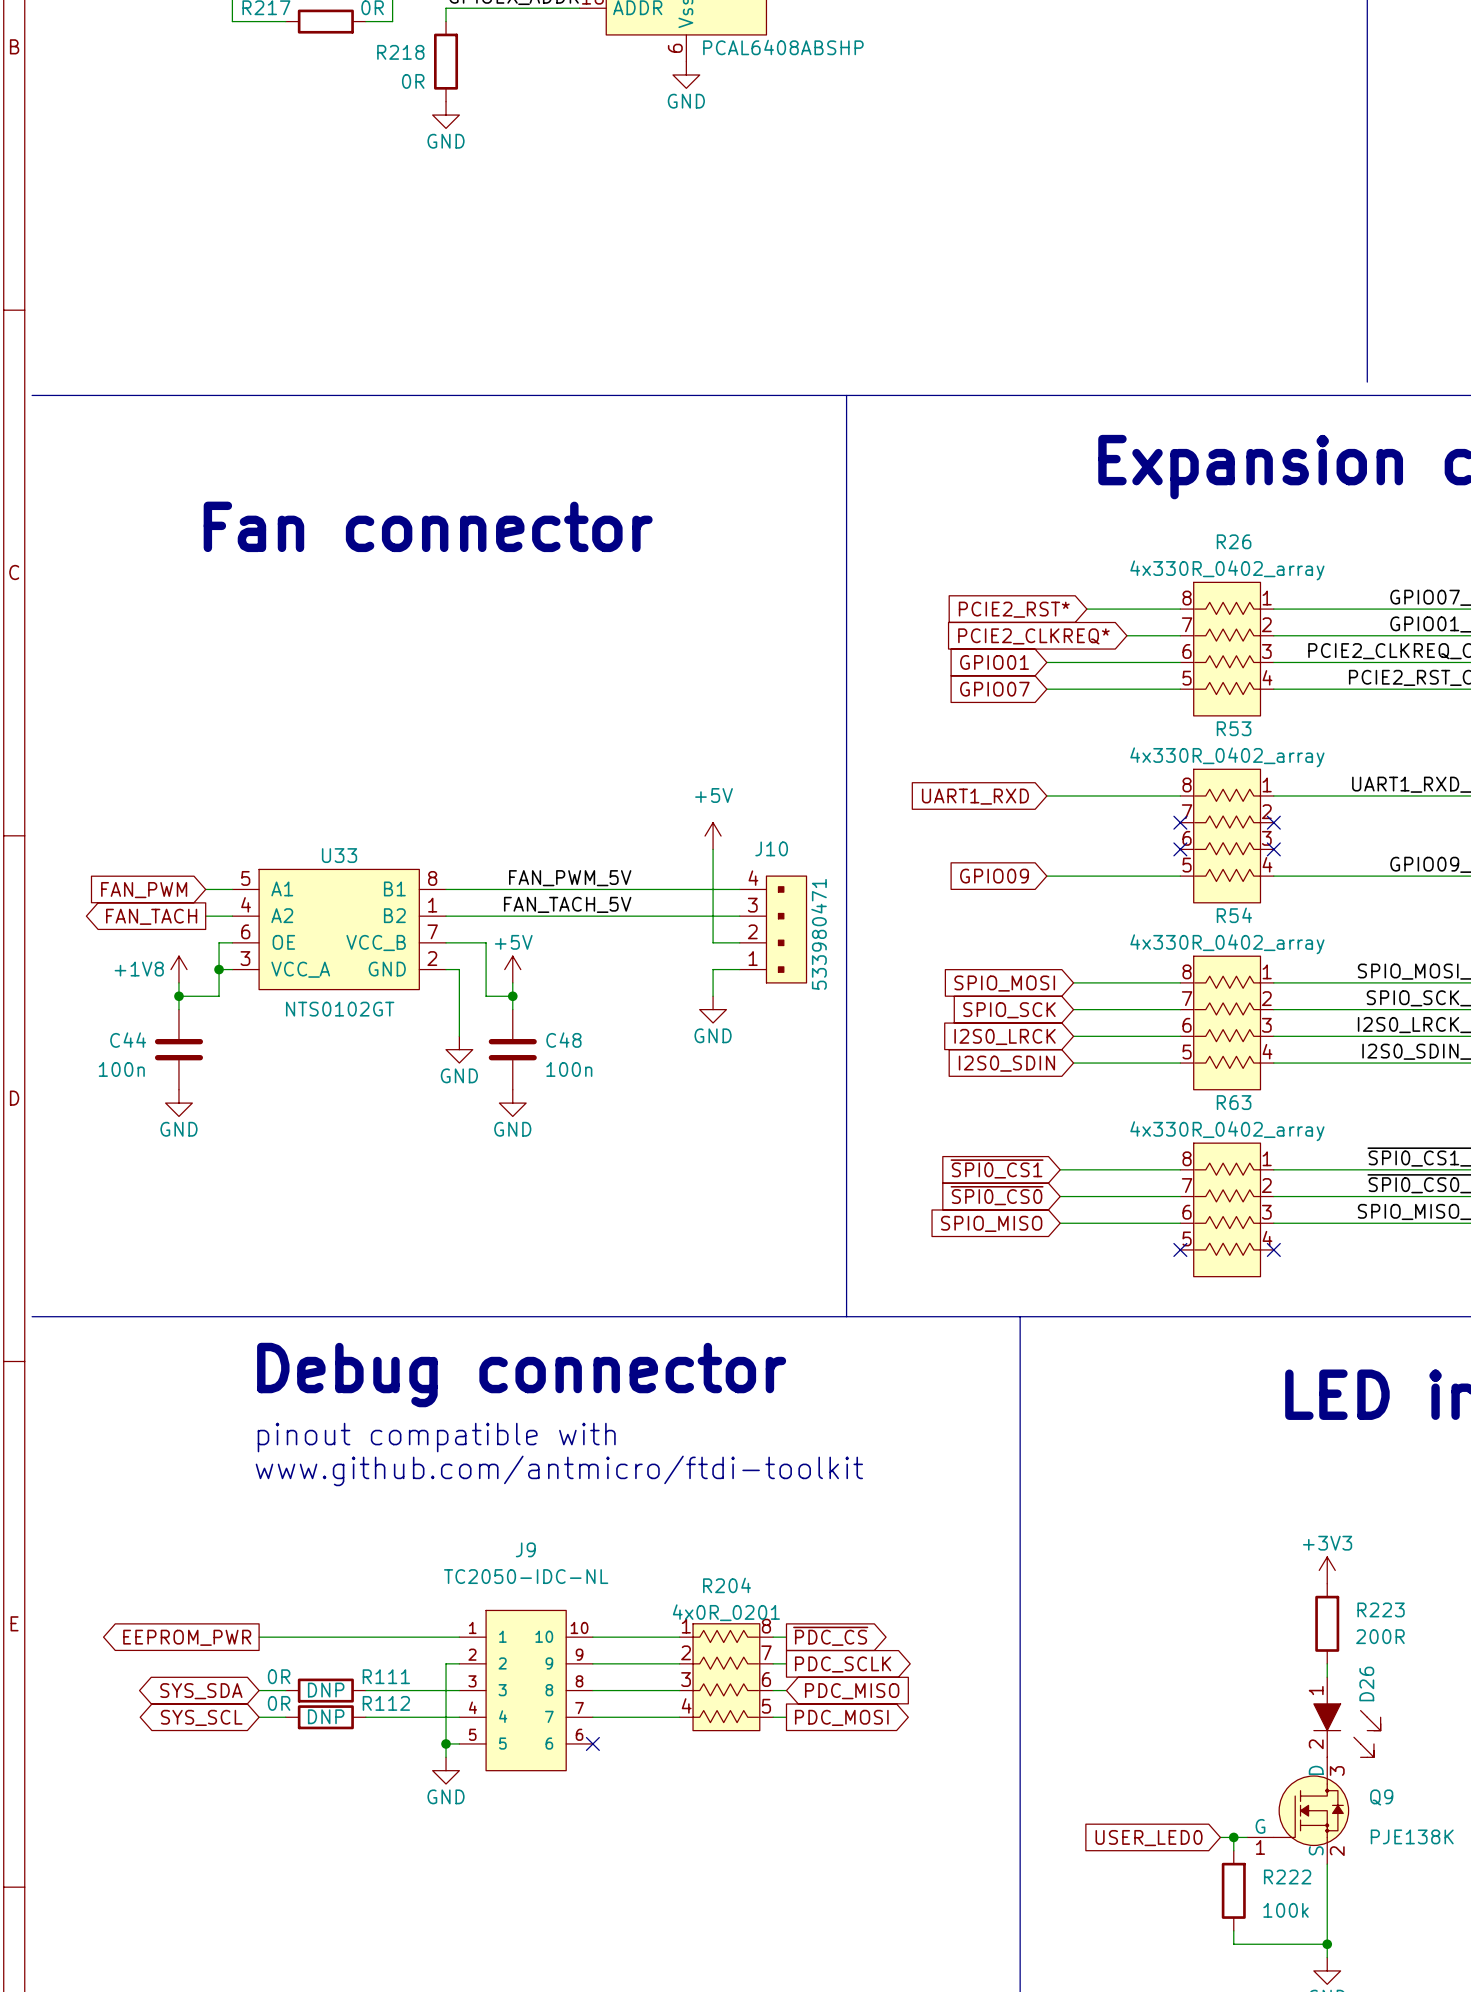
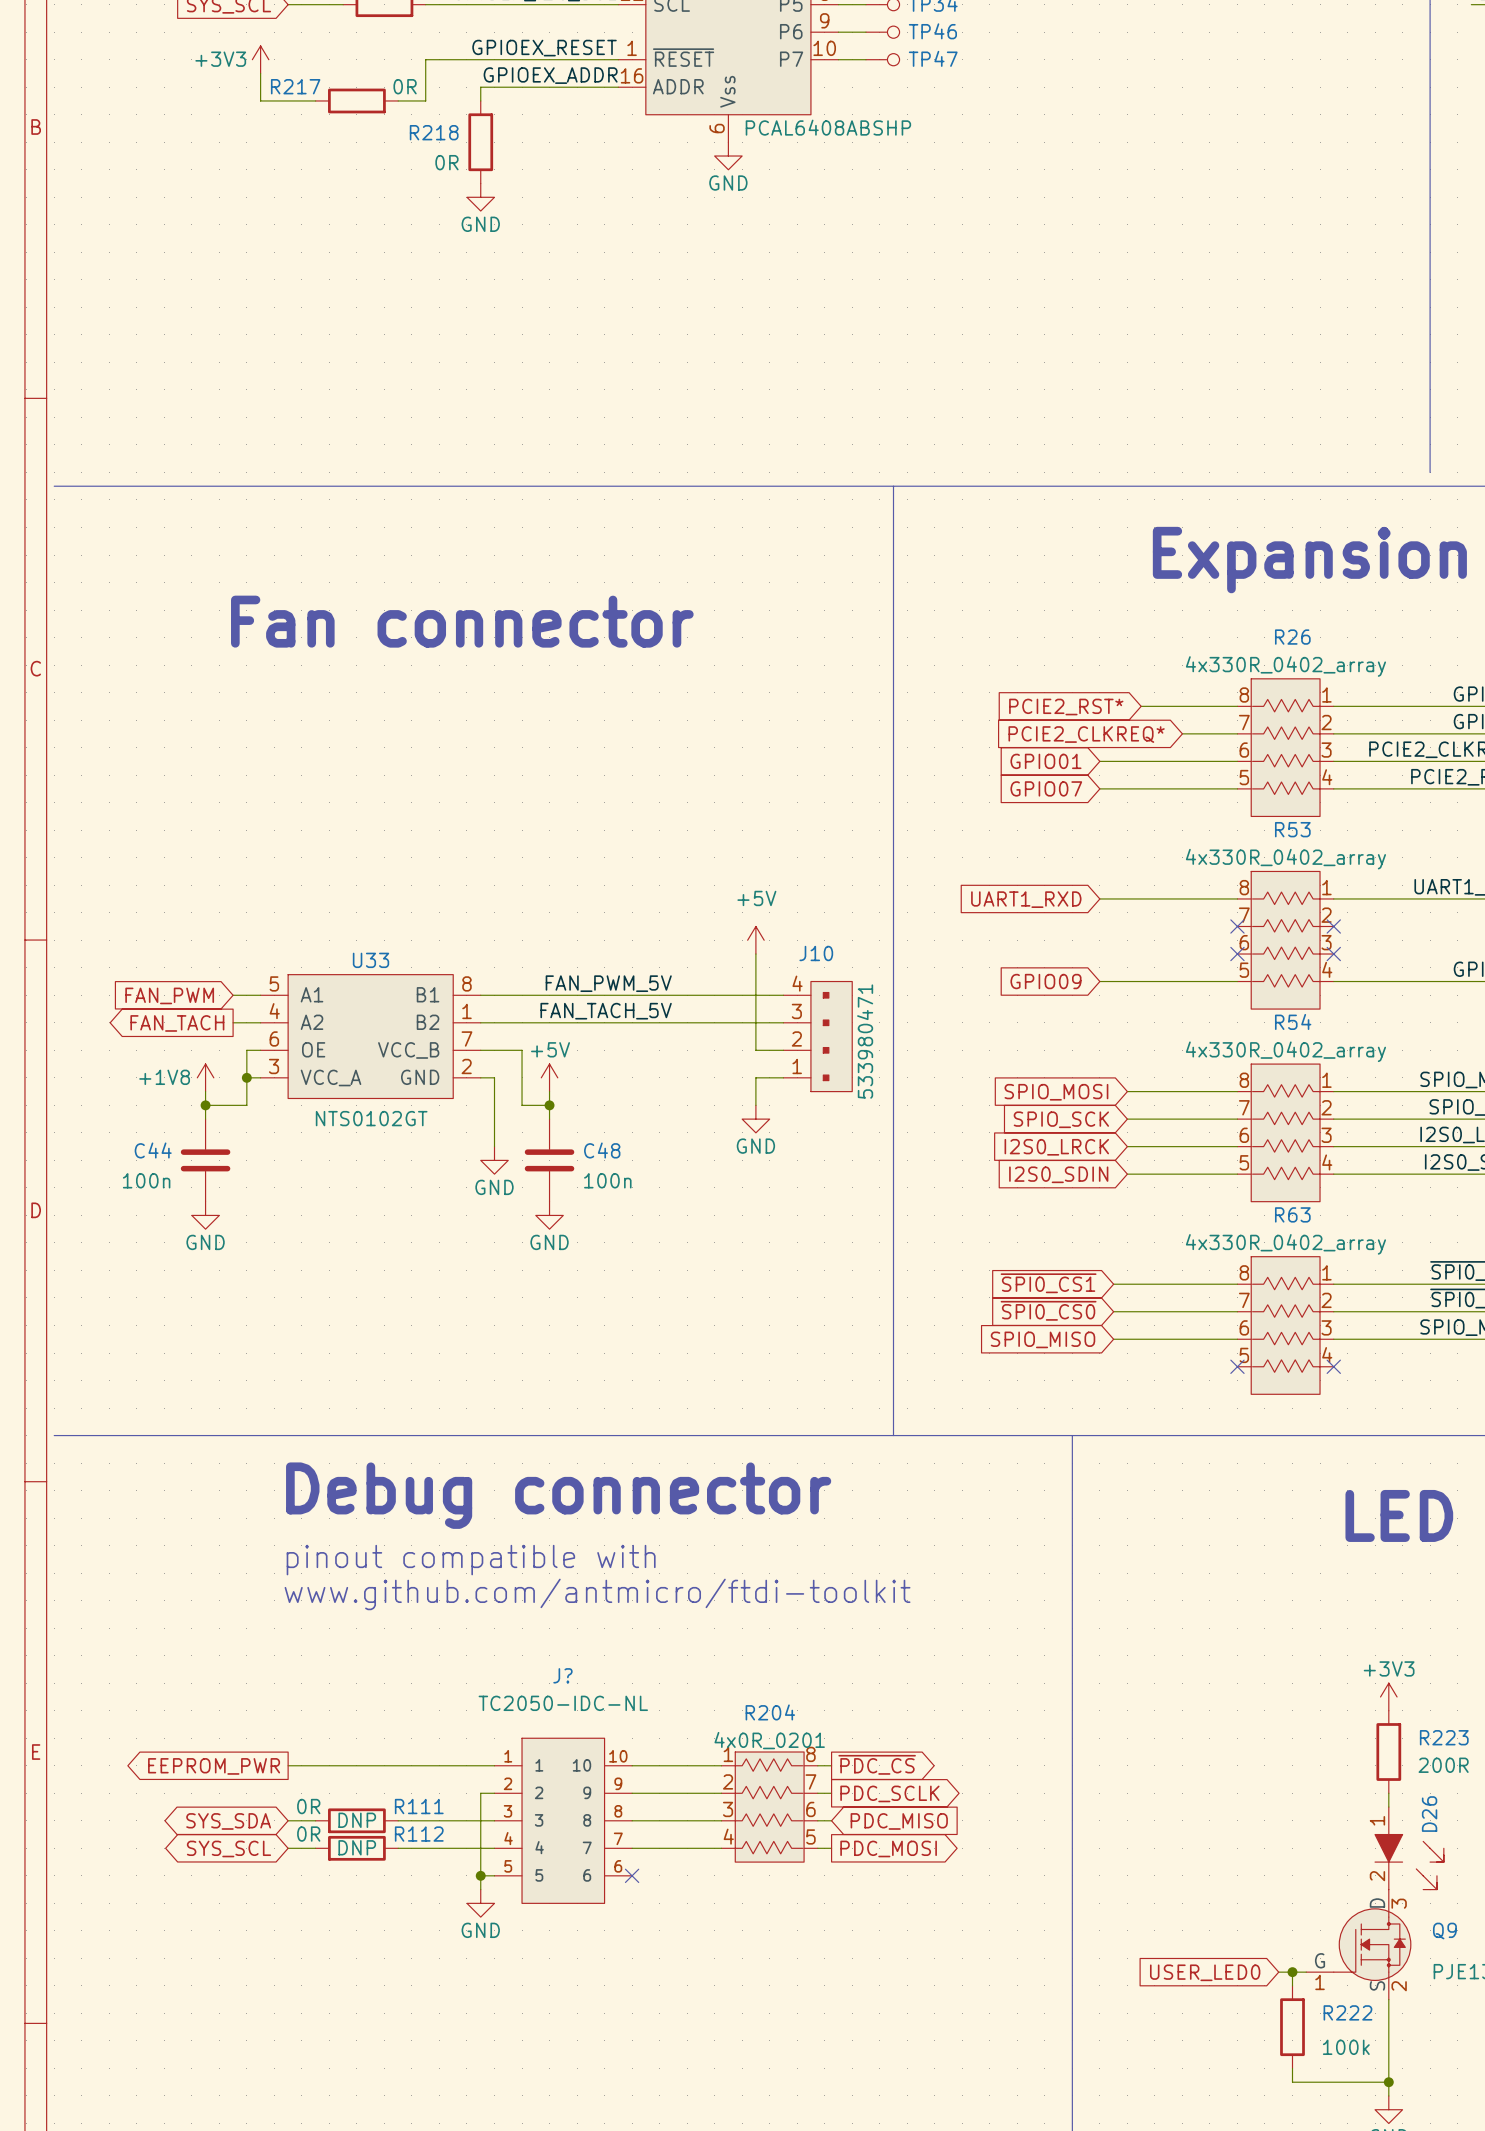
J9 name: J9 (525, 1549) -> J? (562, 1675)

